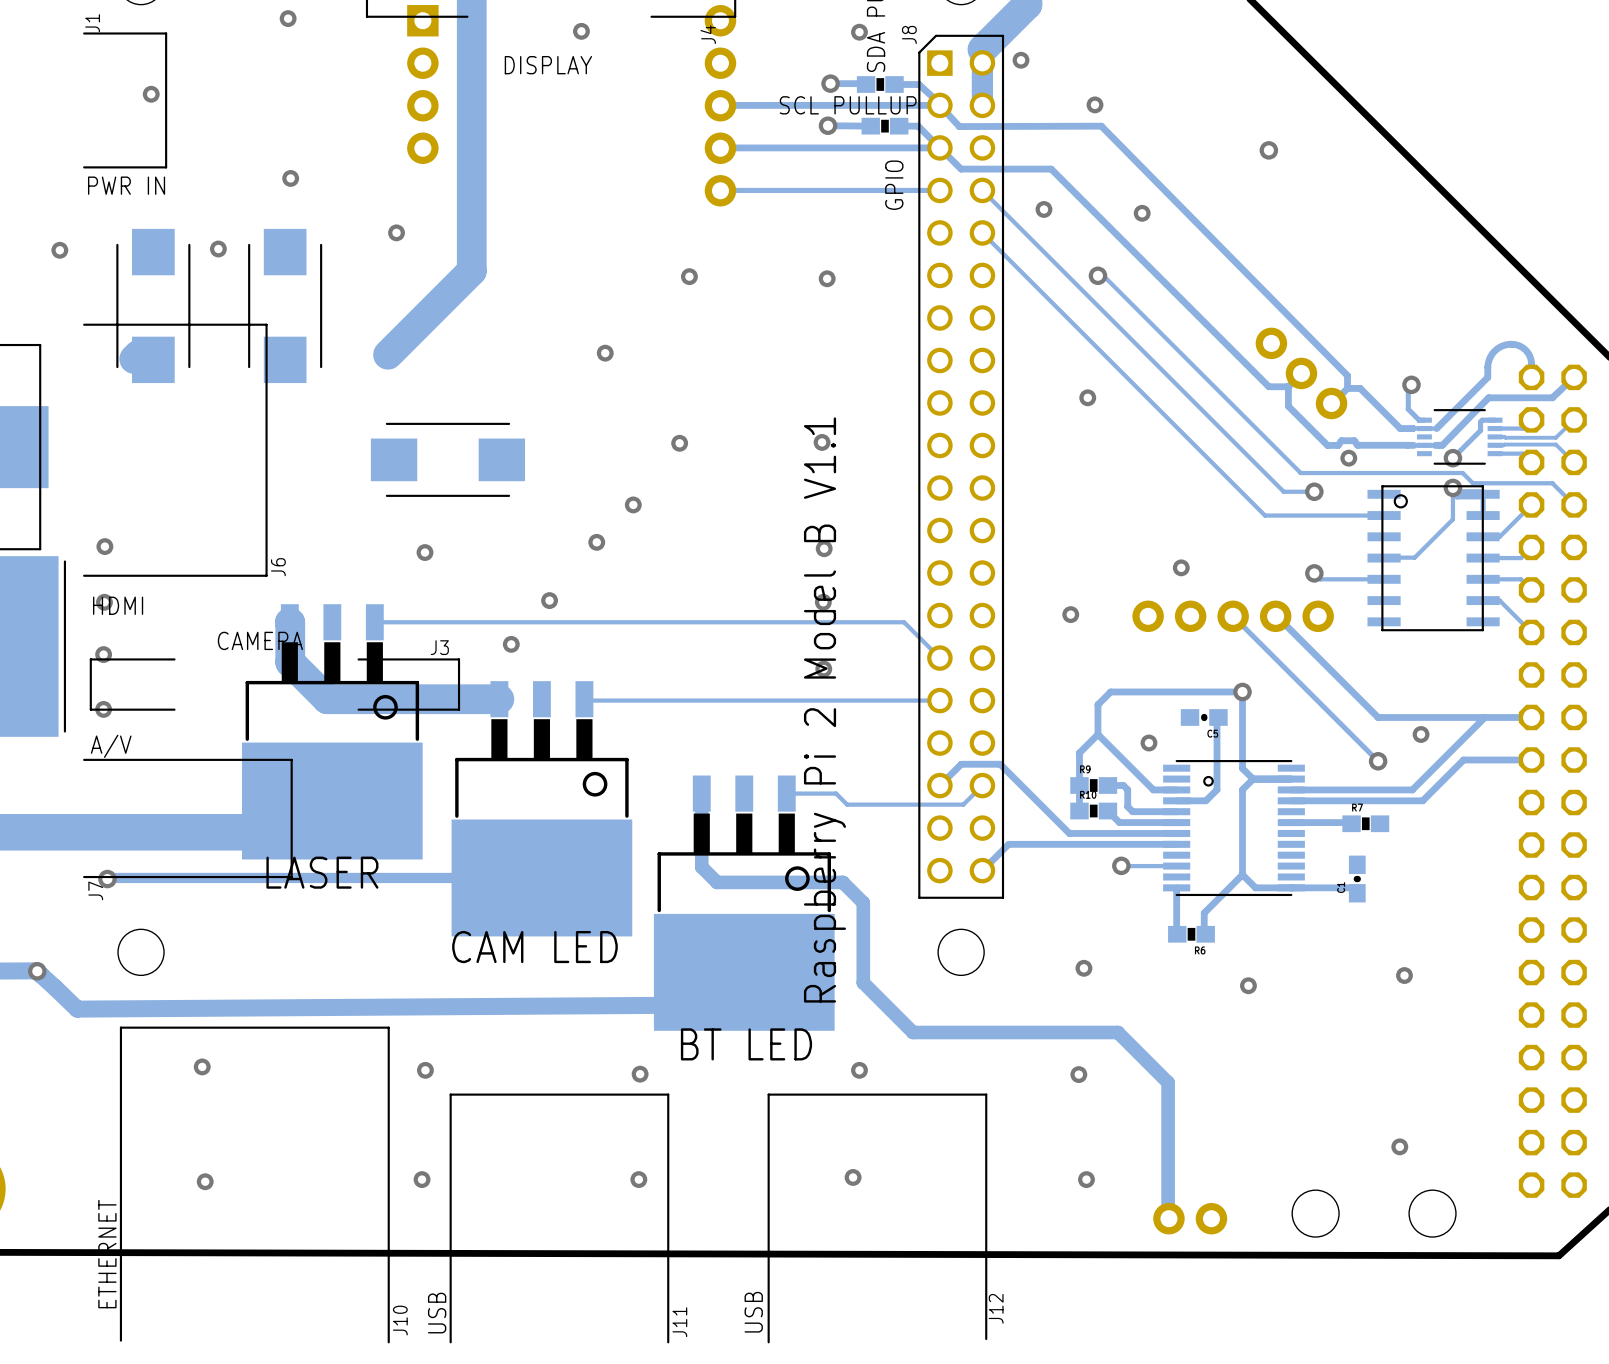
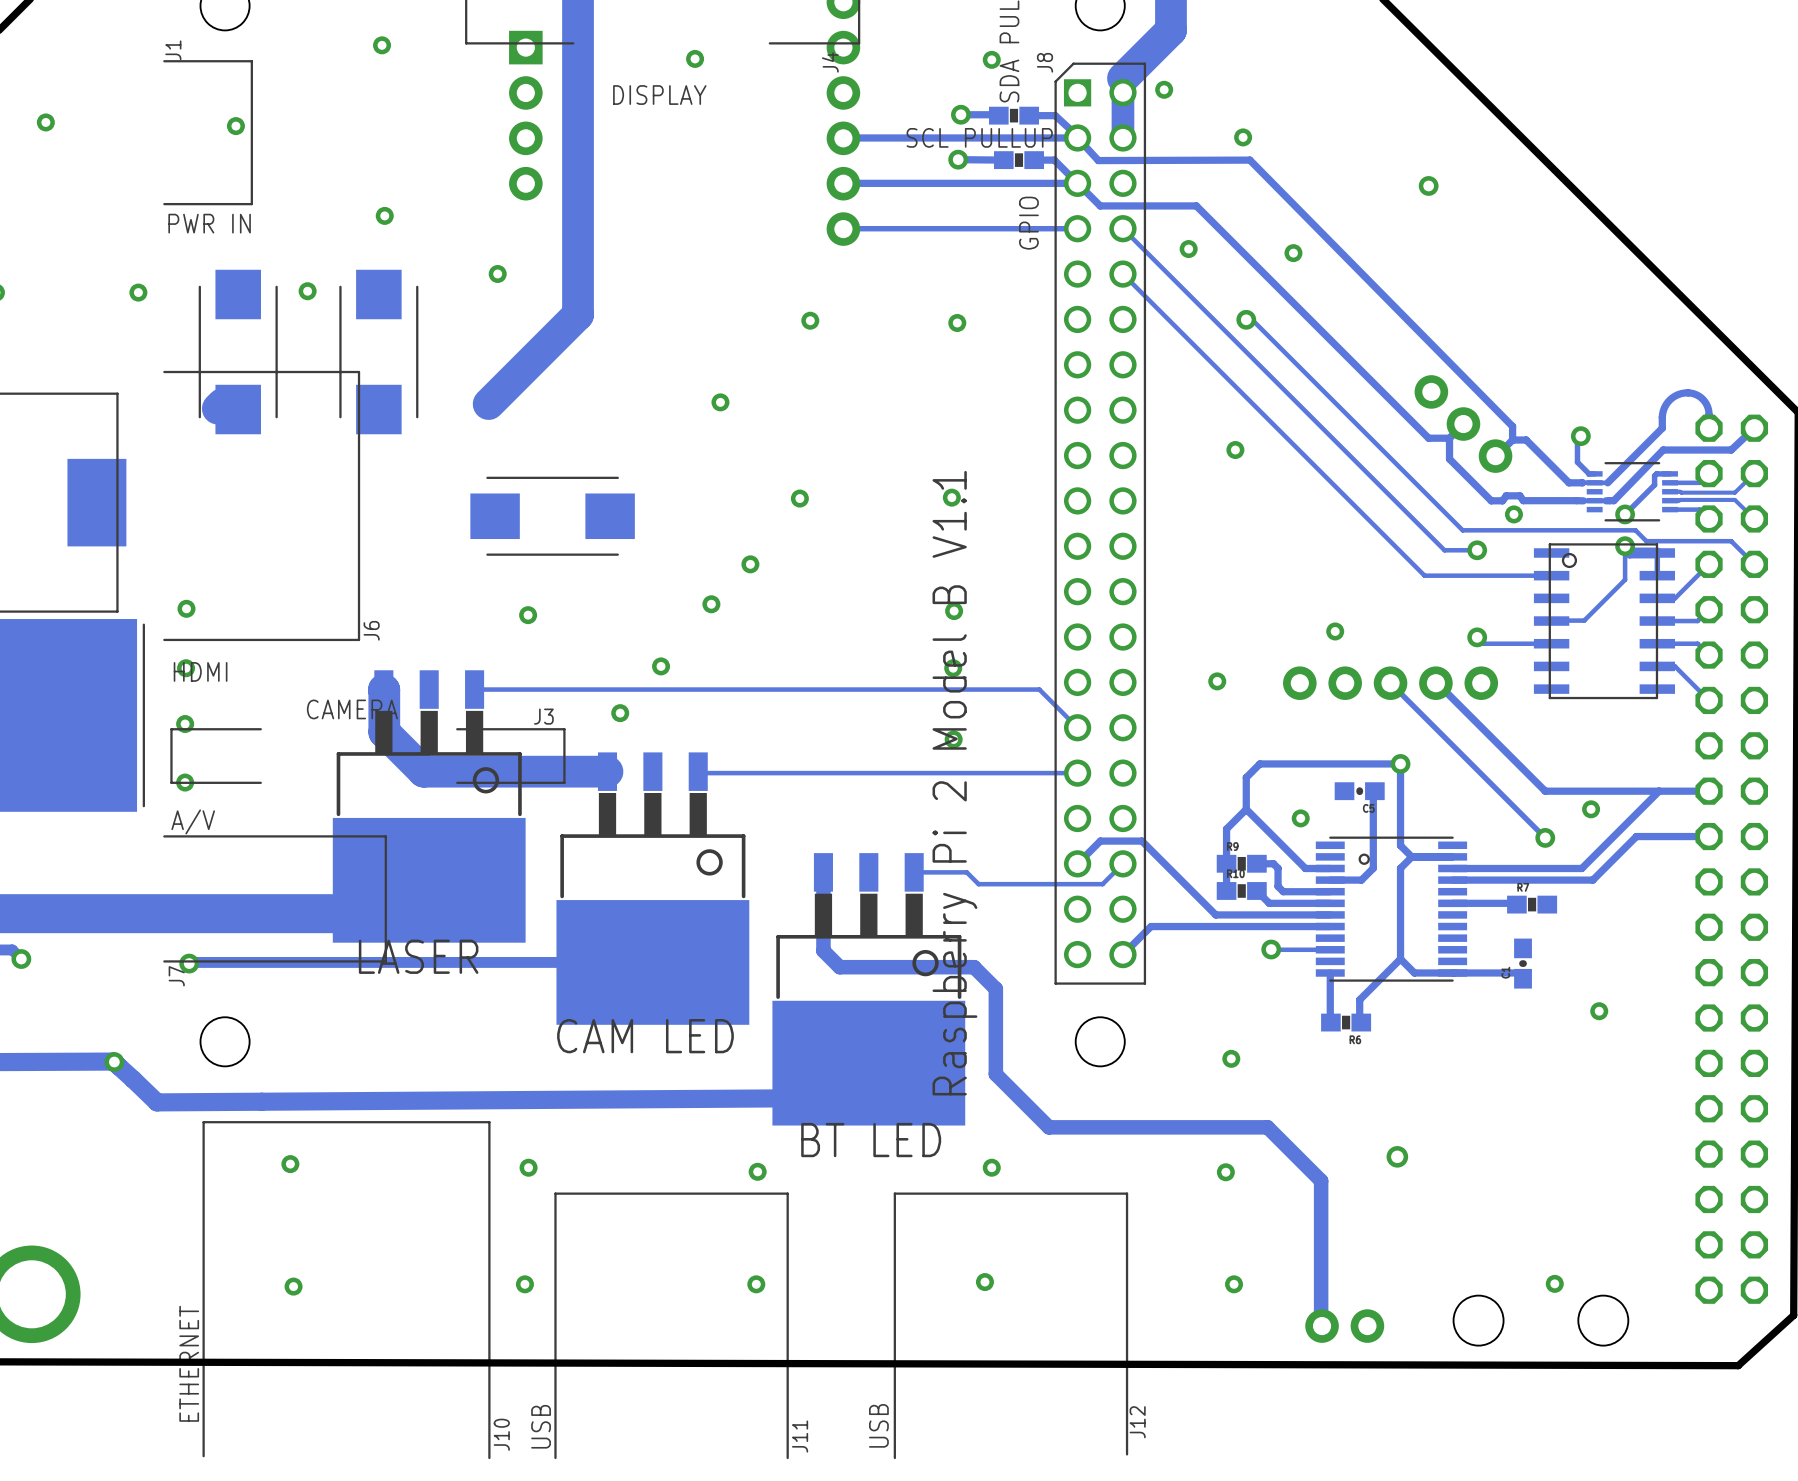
via position: (1404, 975) -> (1599, 1011)
via: (1248, 985) -> none
via: none -> (1397, 1156)
via position: (1399, 1146) -> (1554, 1283)

